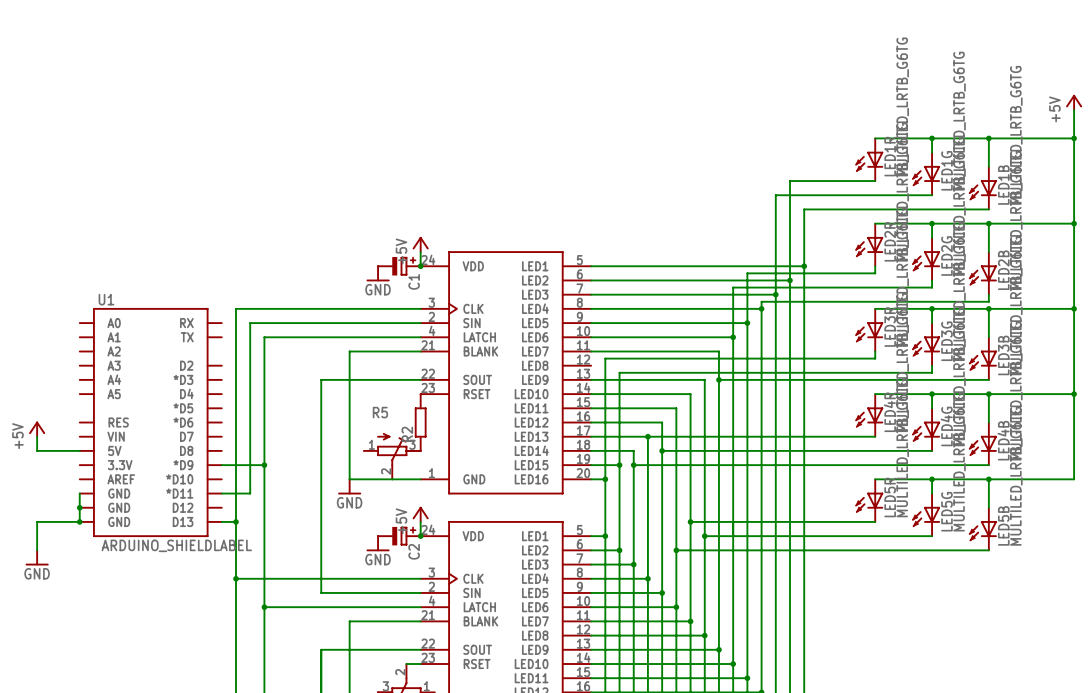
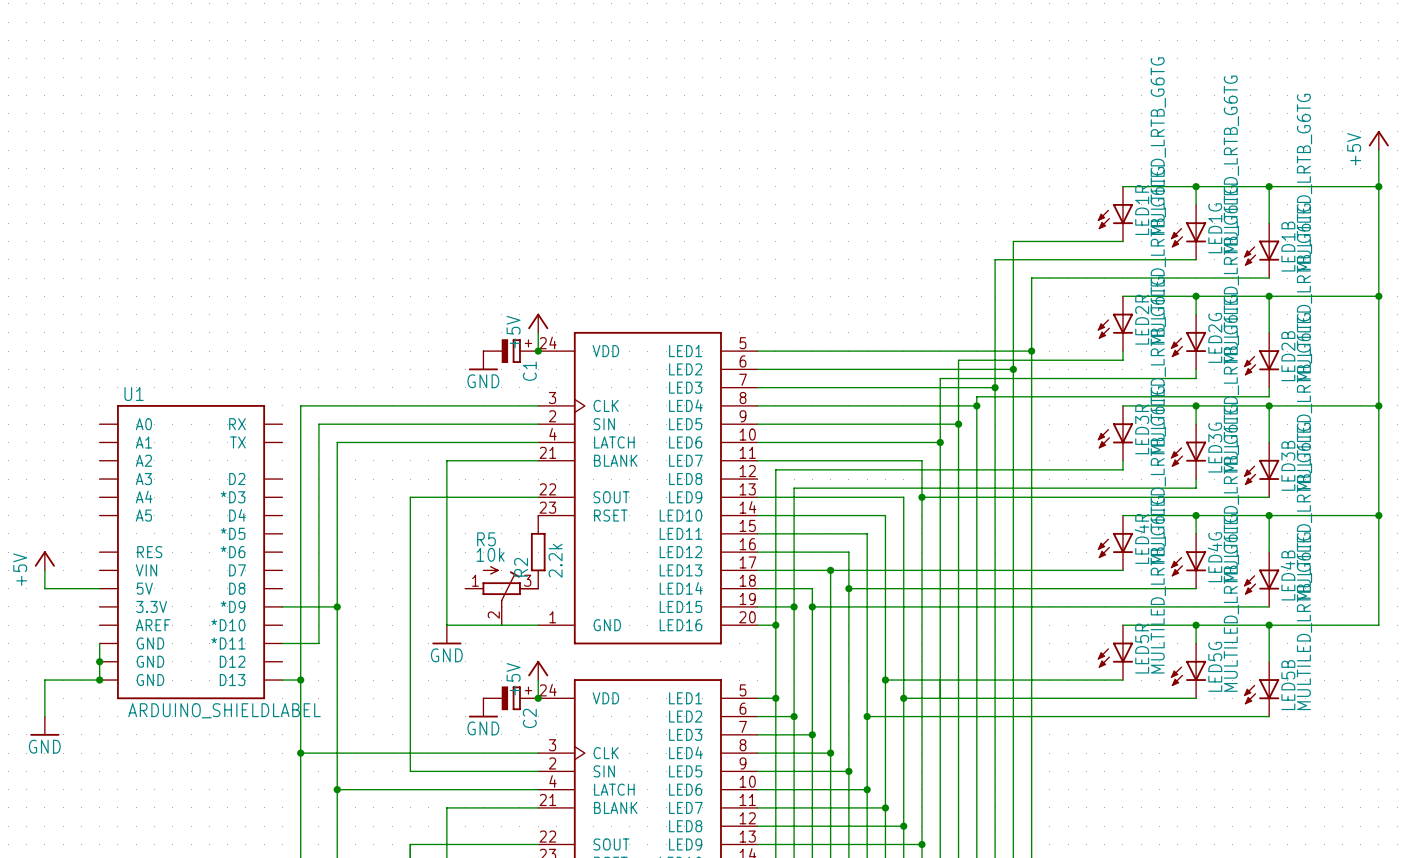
R5 value: none -> 10k (490, 554)
R2 value: none -> 2.2k (555, 560)

